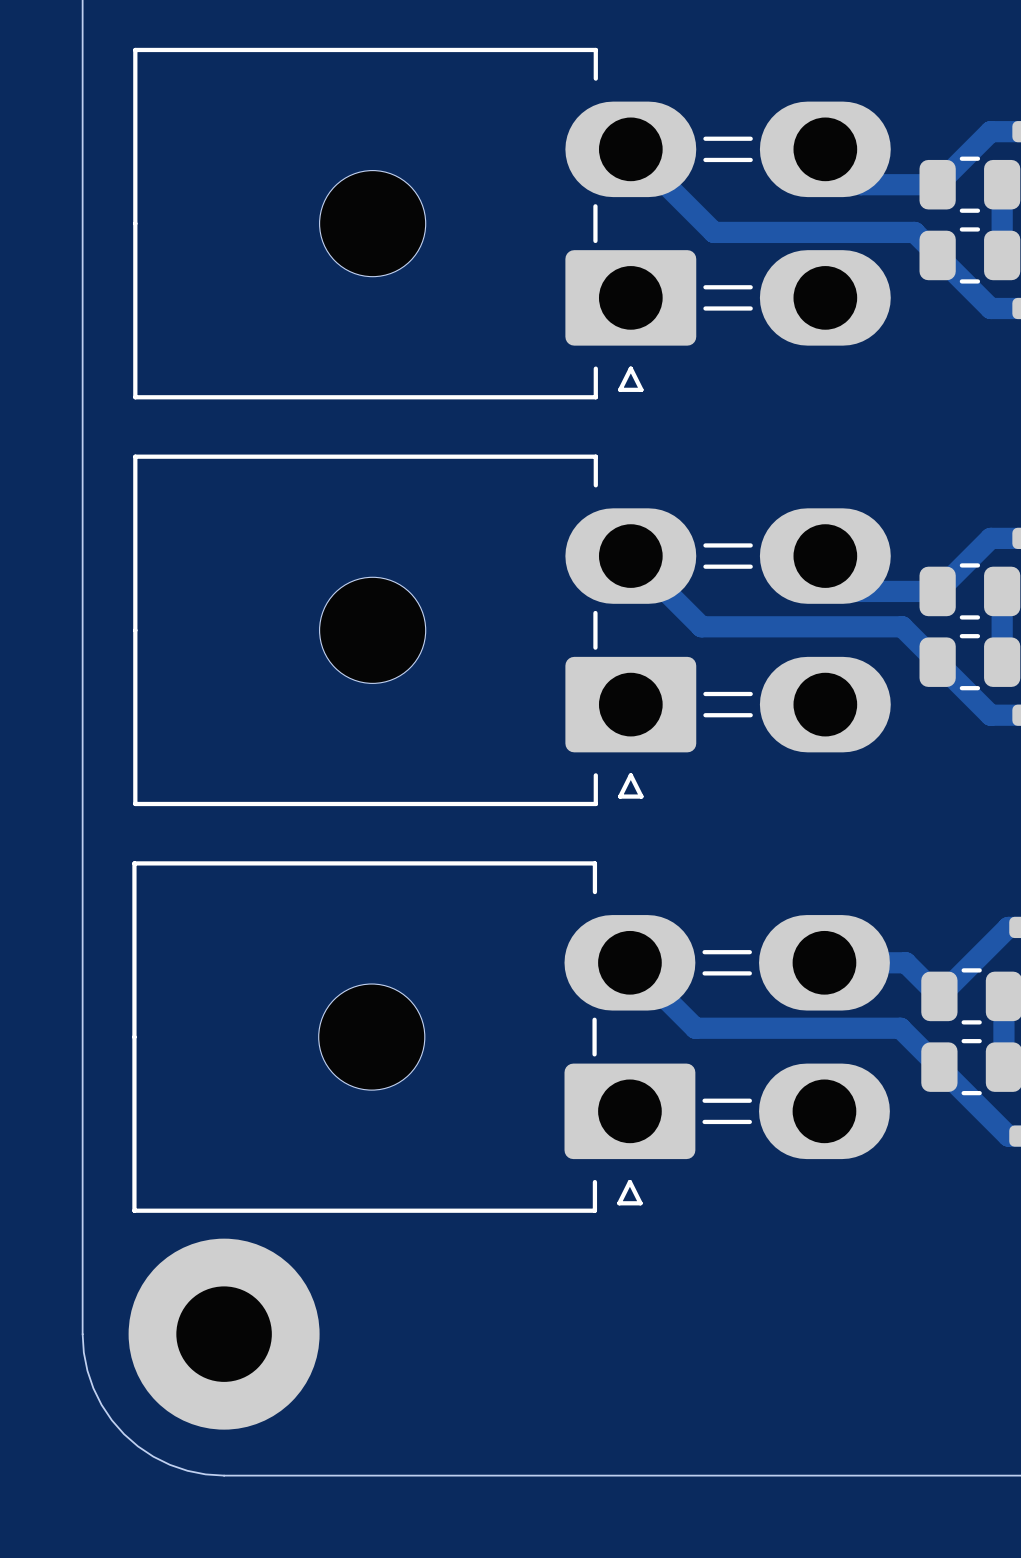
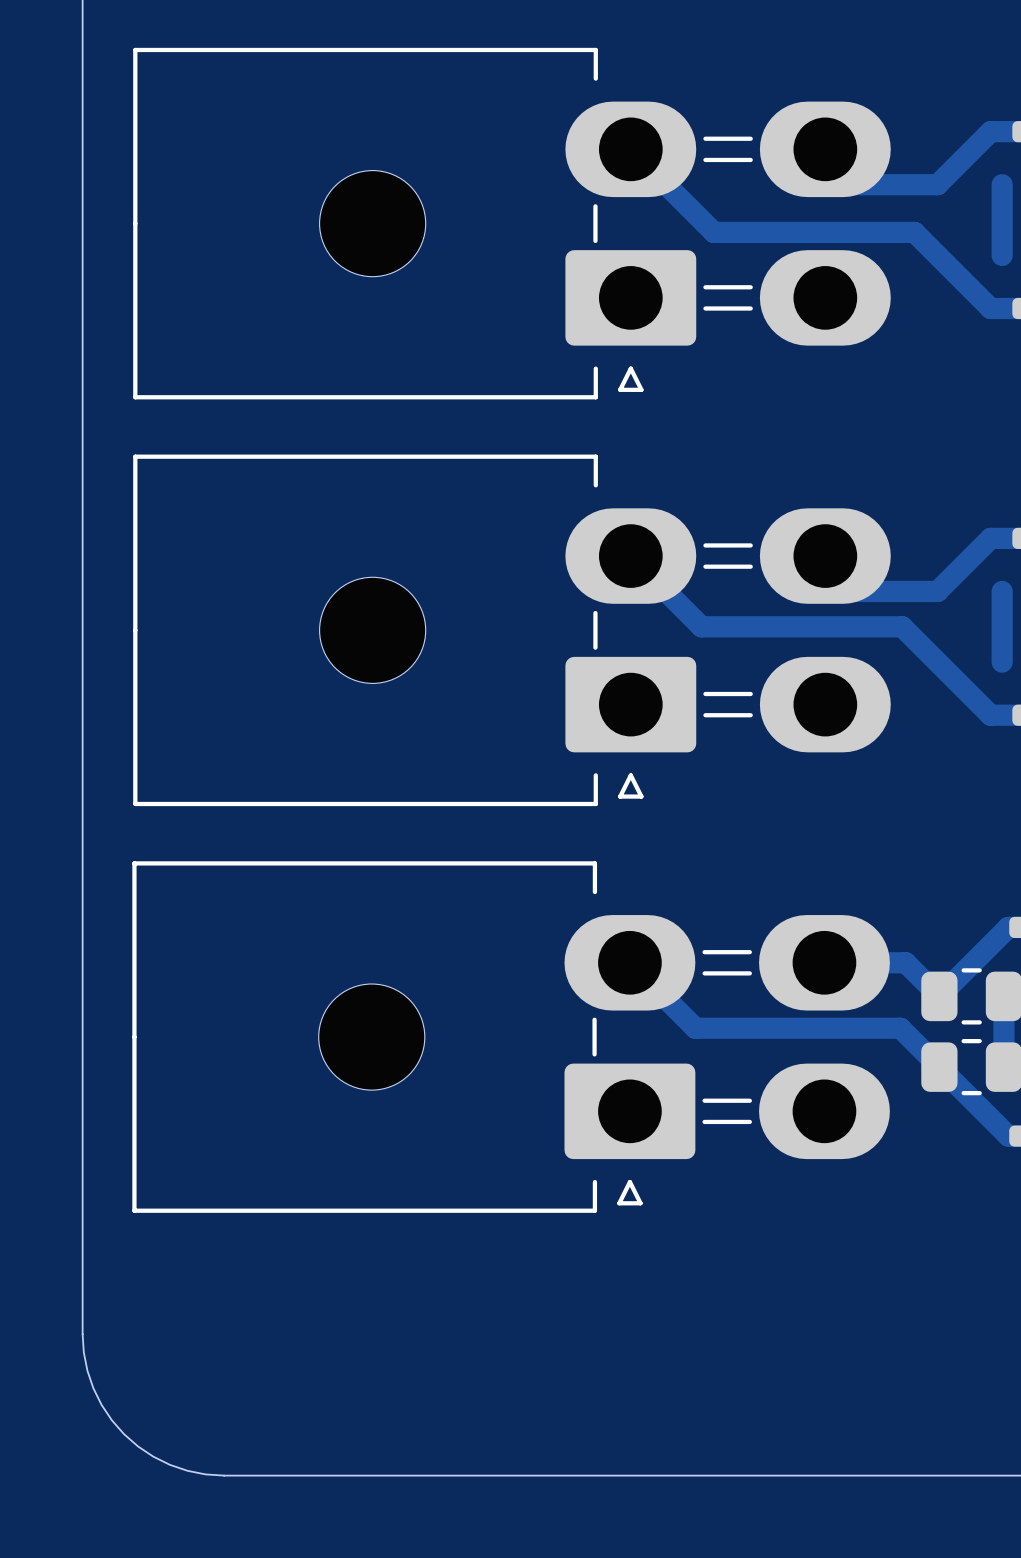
part: (969, 184) -> none
part: (969, 255) -> none
part: (969, 591) -> none
part: (969, 662) -> none
part: (224, 1334) -> none

